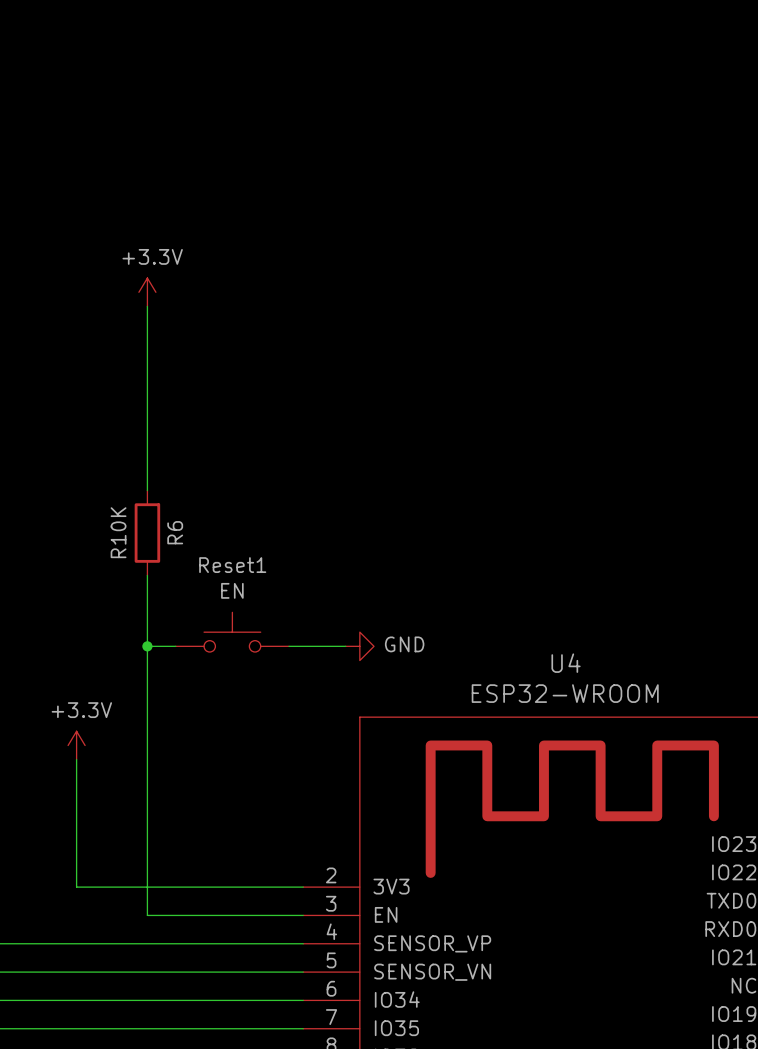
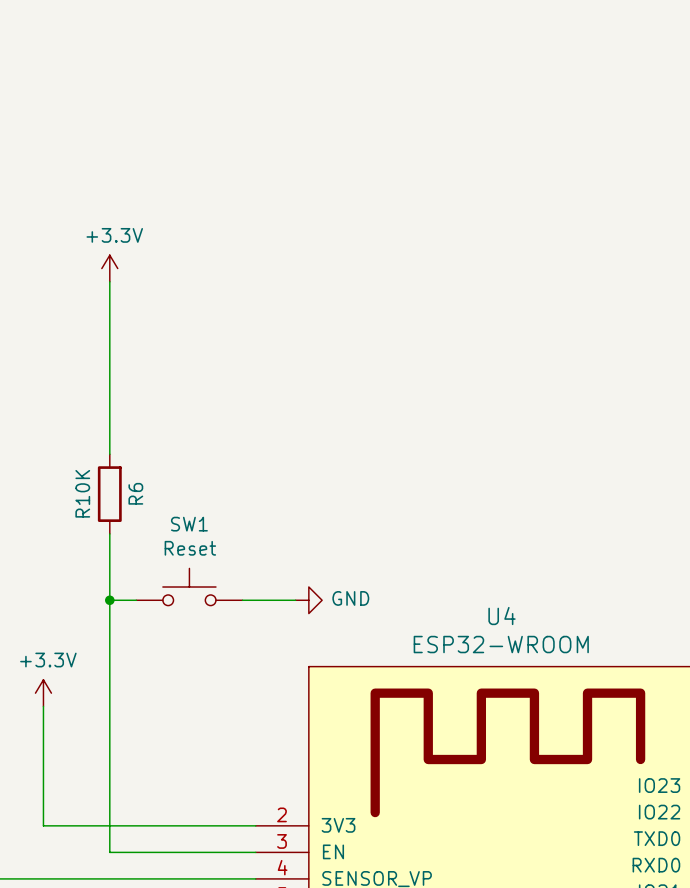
Reset1 name: Reset1 (232, 565) -> SW1 (189, 524)
Reset1 value: EN (232, 590) -> Reset (190, 548)

